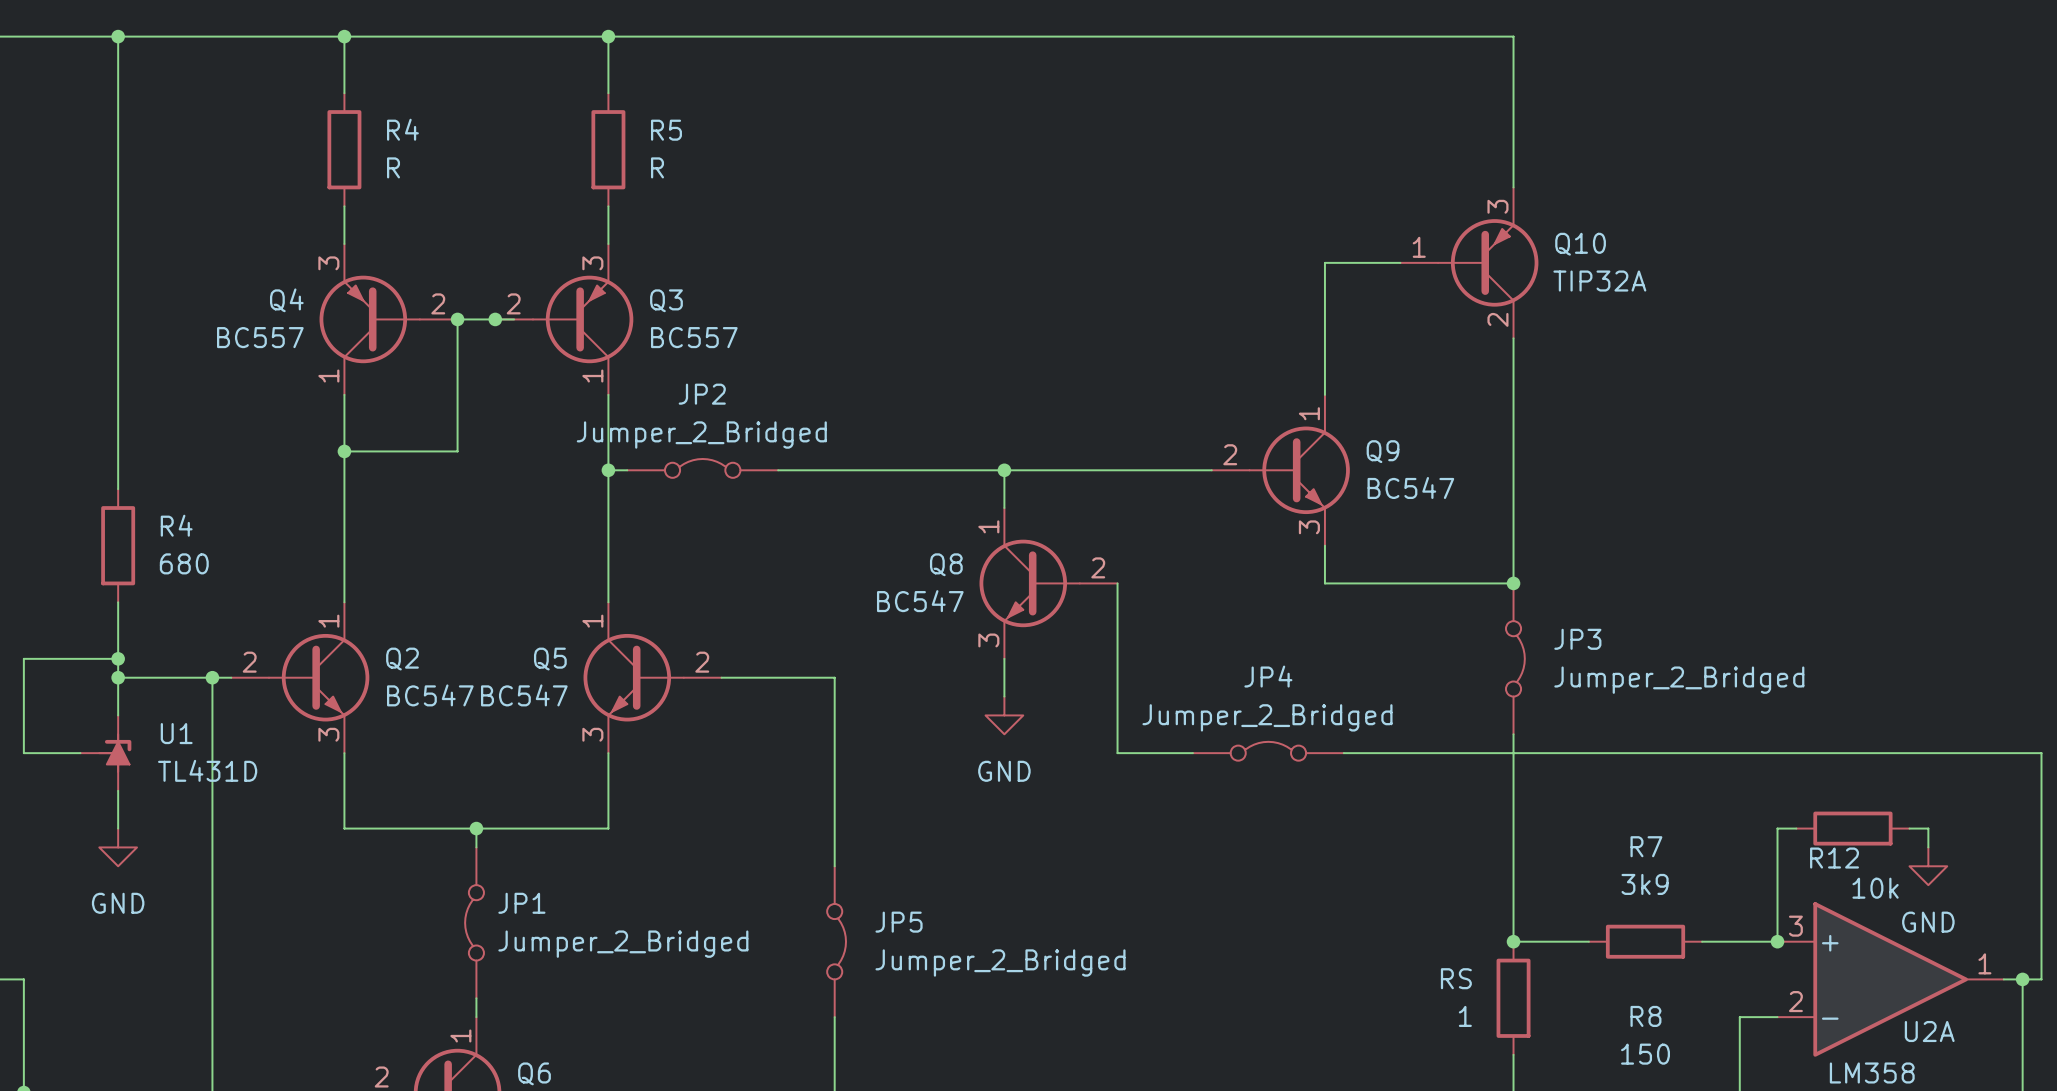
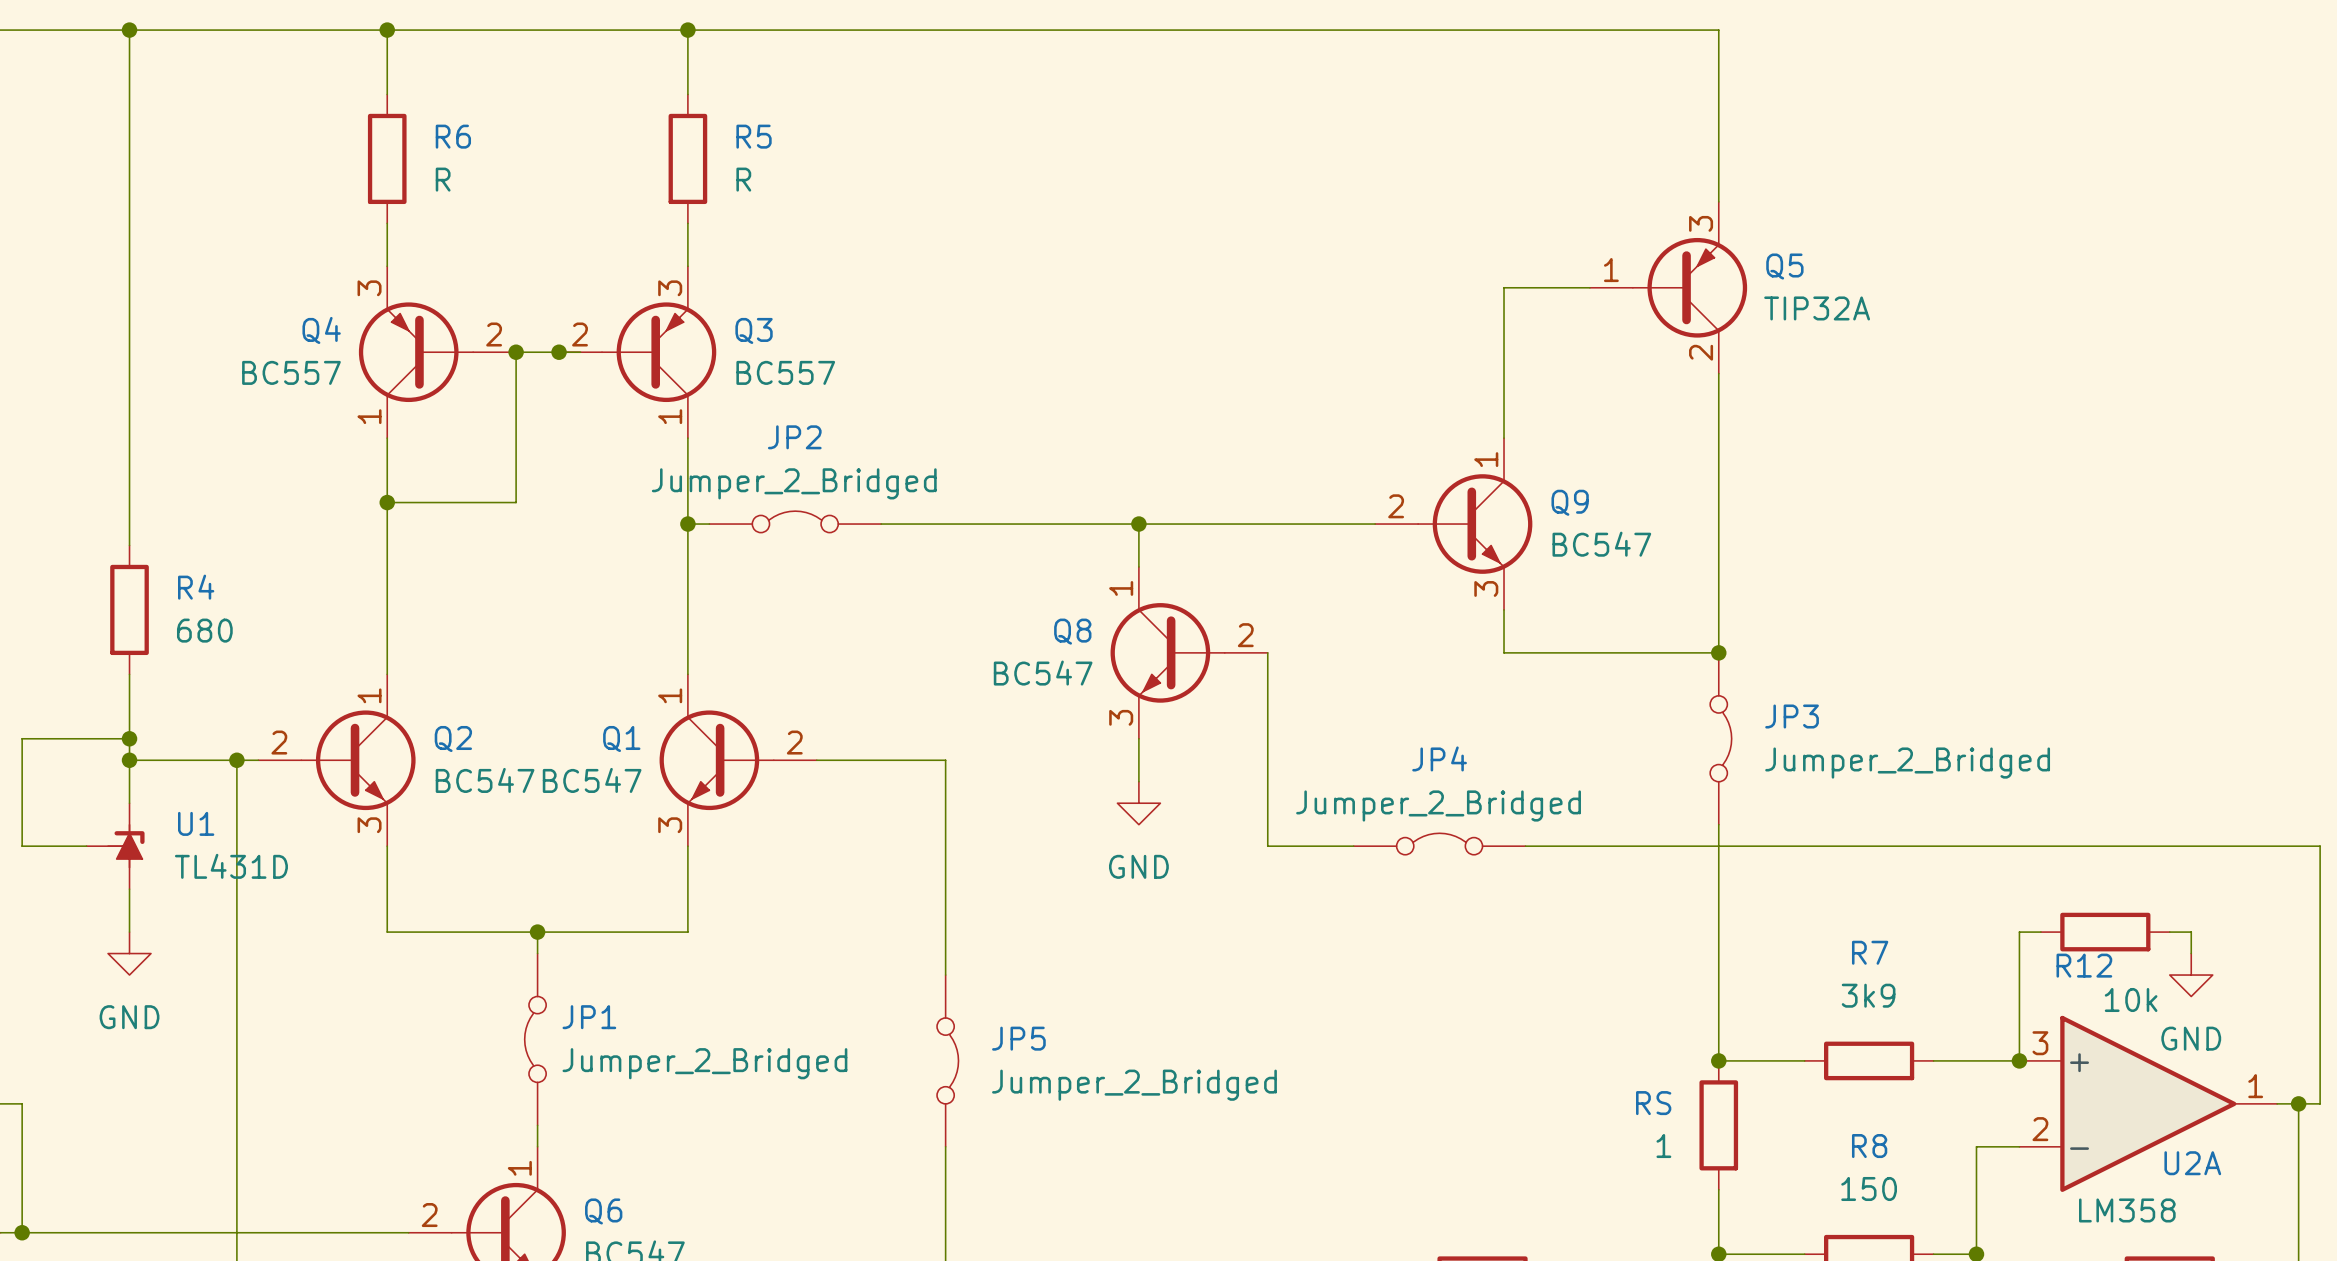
R4 name: R4 (402, 129) -> R6 (453, 136)
Q10 name: Q10 (1580, 244) -> Q5 (1784, 266)
Q5 name: Q5 (550, 659) -> Q1 (621, 739)

